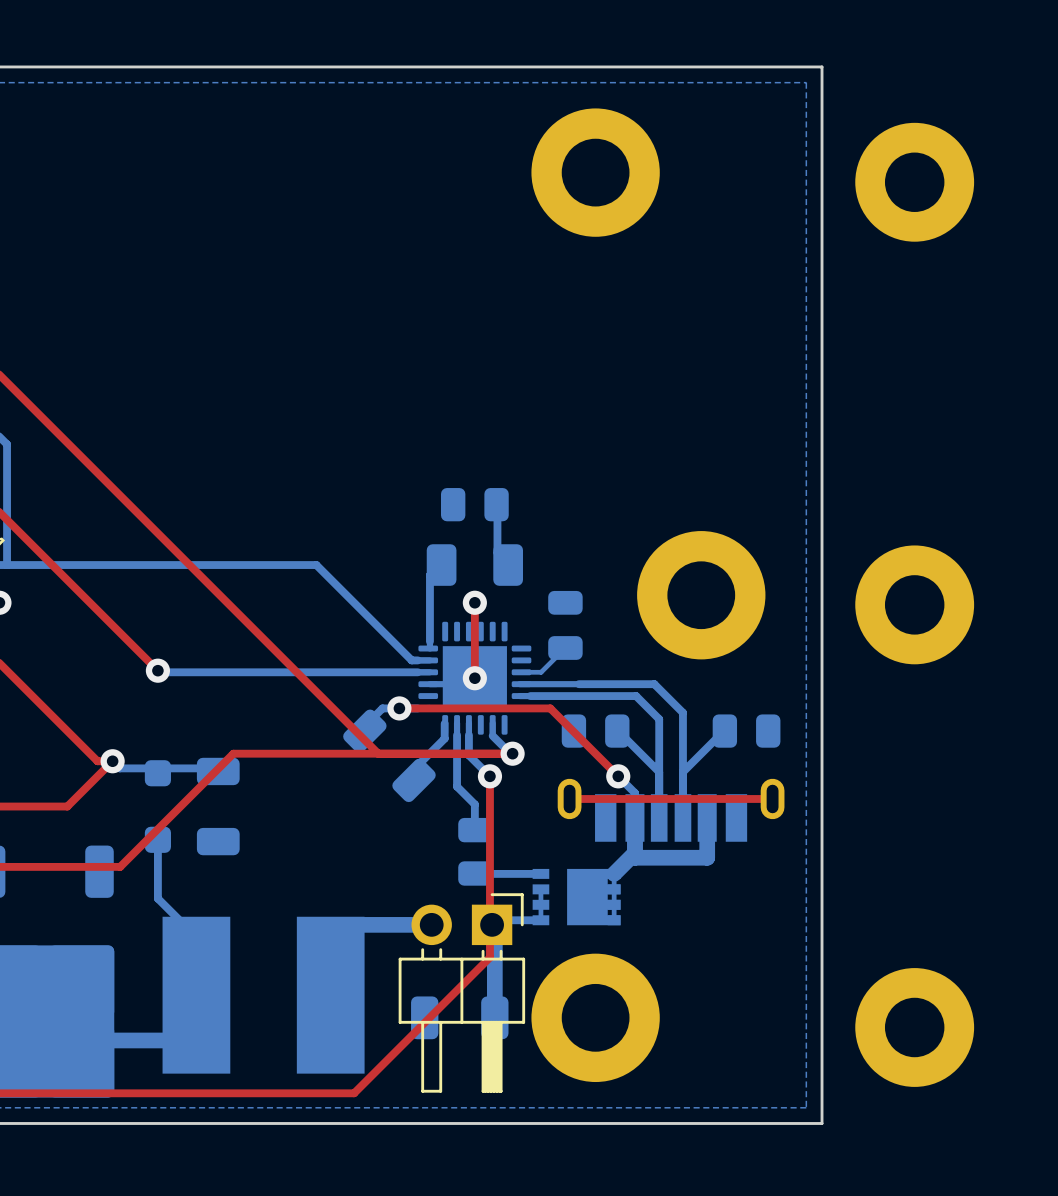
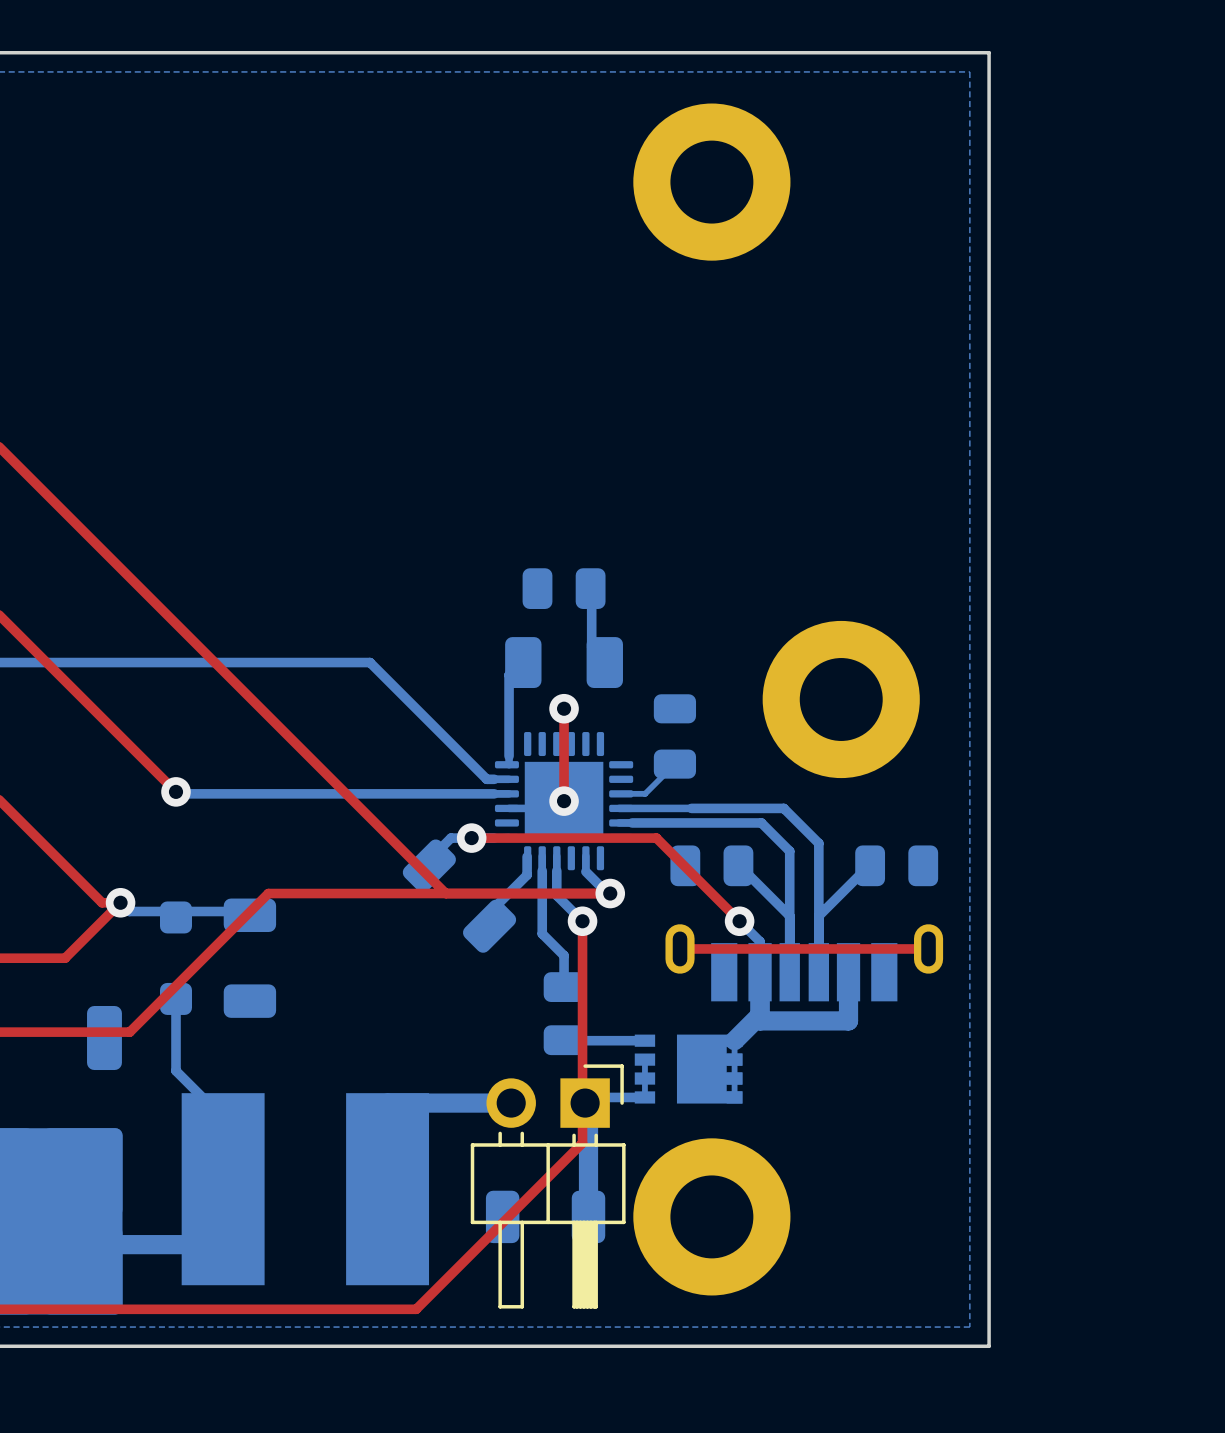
part: (914, 182) -> none
part: (914, 604) -> none
part: (914, 1027) -> none

